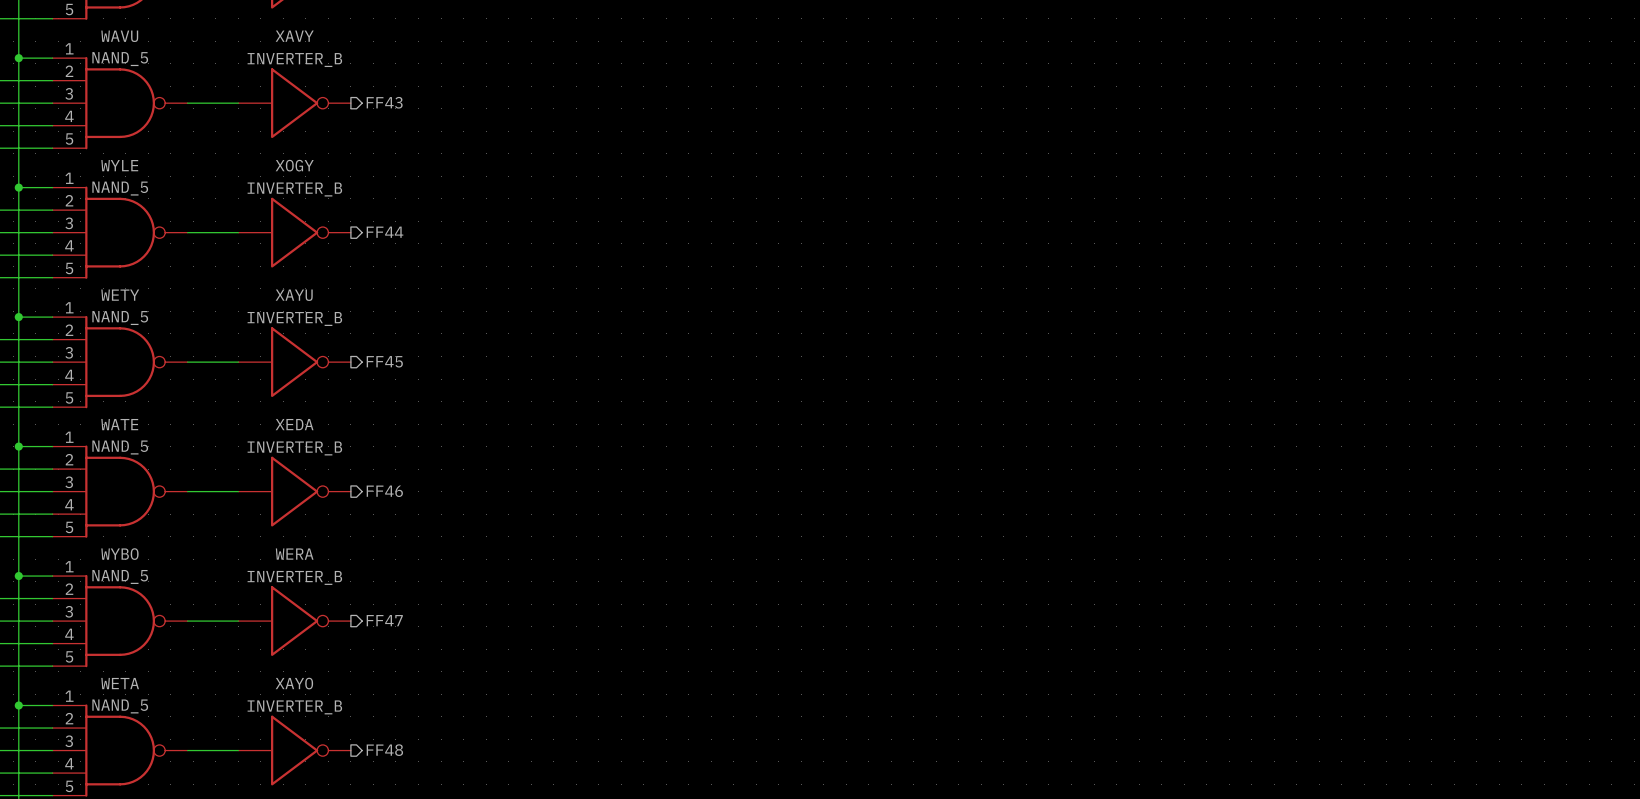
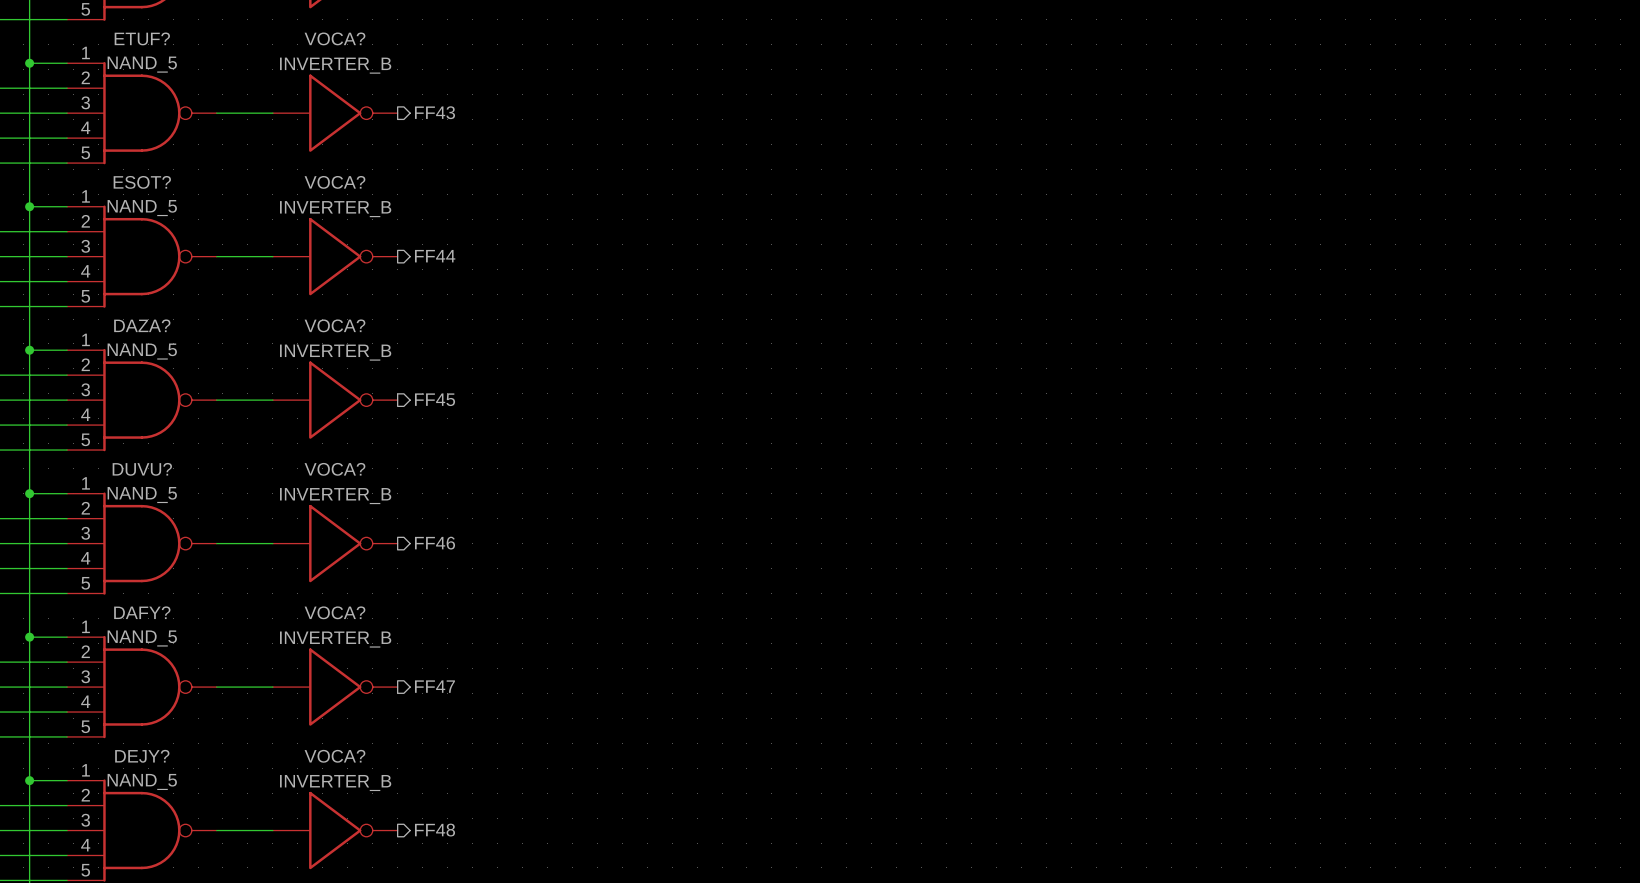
WAVU name: WAVU (119, 36) -> ETUF? (142, 38)
XAVY name: XAVY (294, 36) -> VOCA? (334, 38)
WYLE name: WYLE (119, 165) -> ESOT? (142, 182)
XOGY name: XOGY (294, 165) -> VOCA? (334, 182)
WETY name: WETY (120, 295) -> DAZA? (142, 325)
XAYU name: XAYU (294, 295) -> VOCA? (334, 325)
WATE name: WATE (119, 424) -> DUVU? (142, 469)
XEDA name: XEDA (294, 424) -> VOCA? (334, 469)
WYBO name: WYBO (119, 554) -> DAFY? (142, 612)
WERA name: WERA (294, 554) -> VOCA? (334, 612)
WETA name: WETA (120, 683) -> DEJY? (142, 756)
XAYO name: XAYO (294, 683) -> VOCA? (334, 756)

